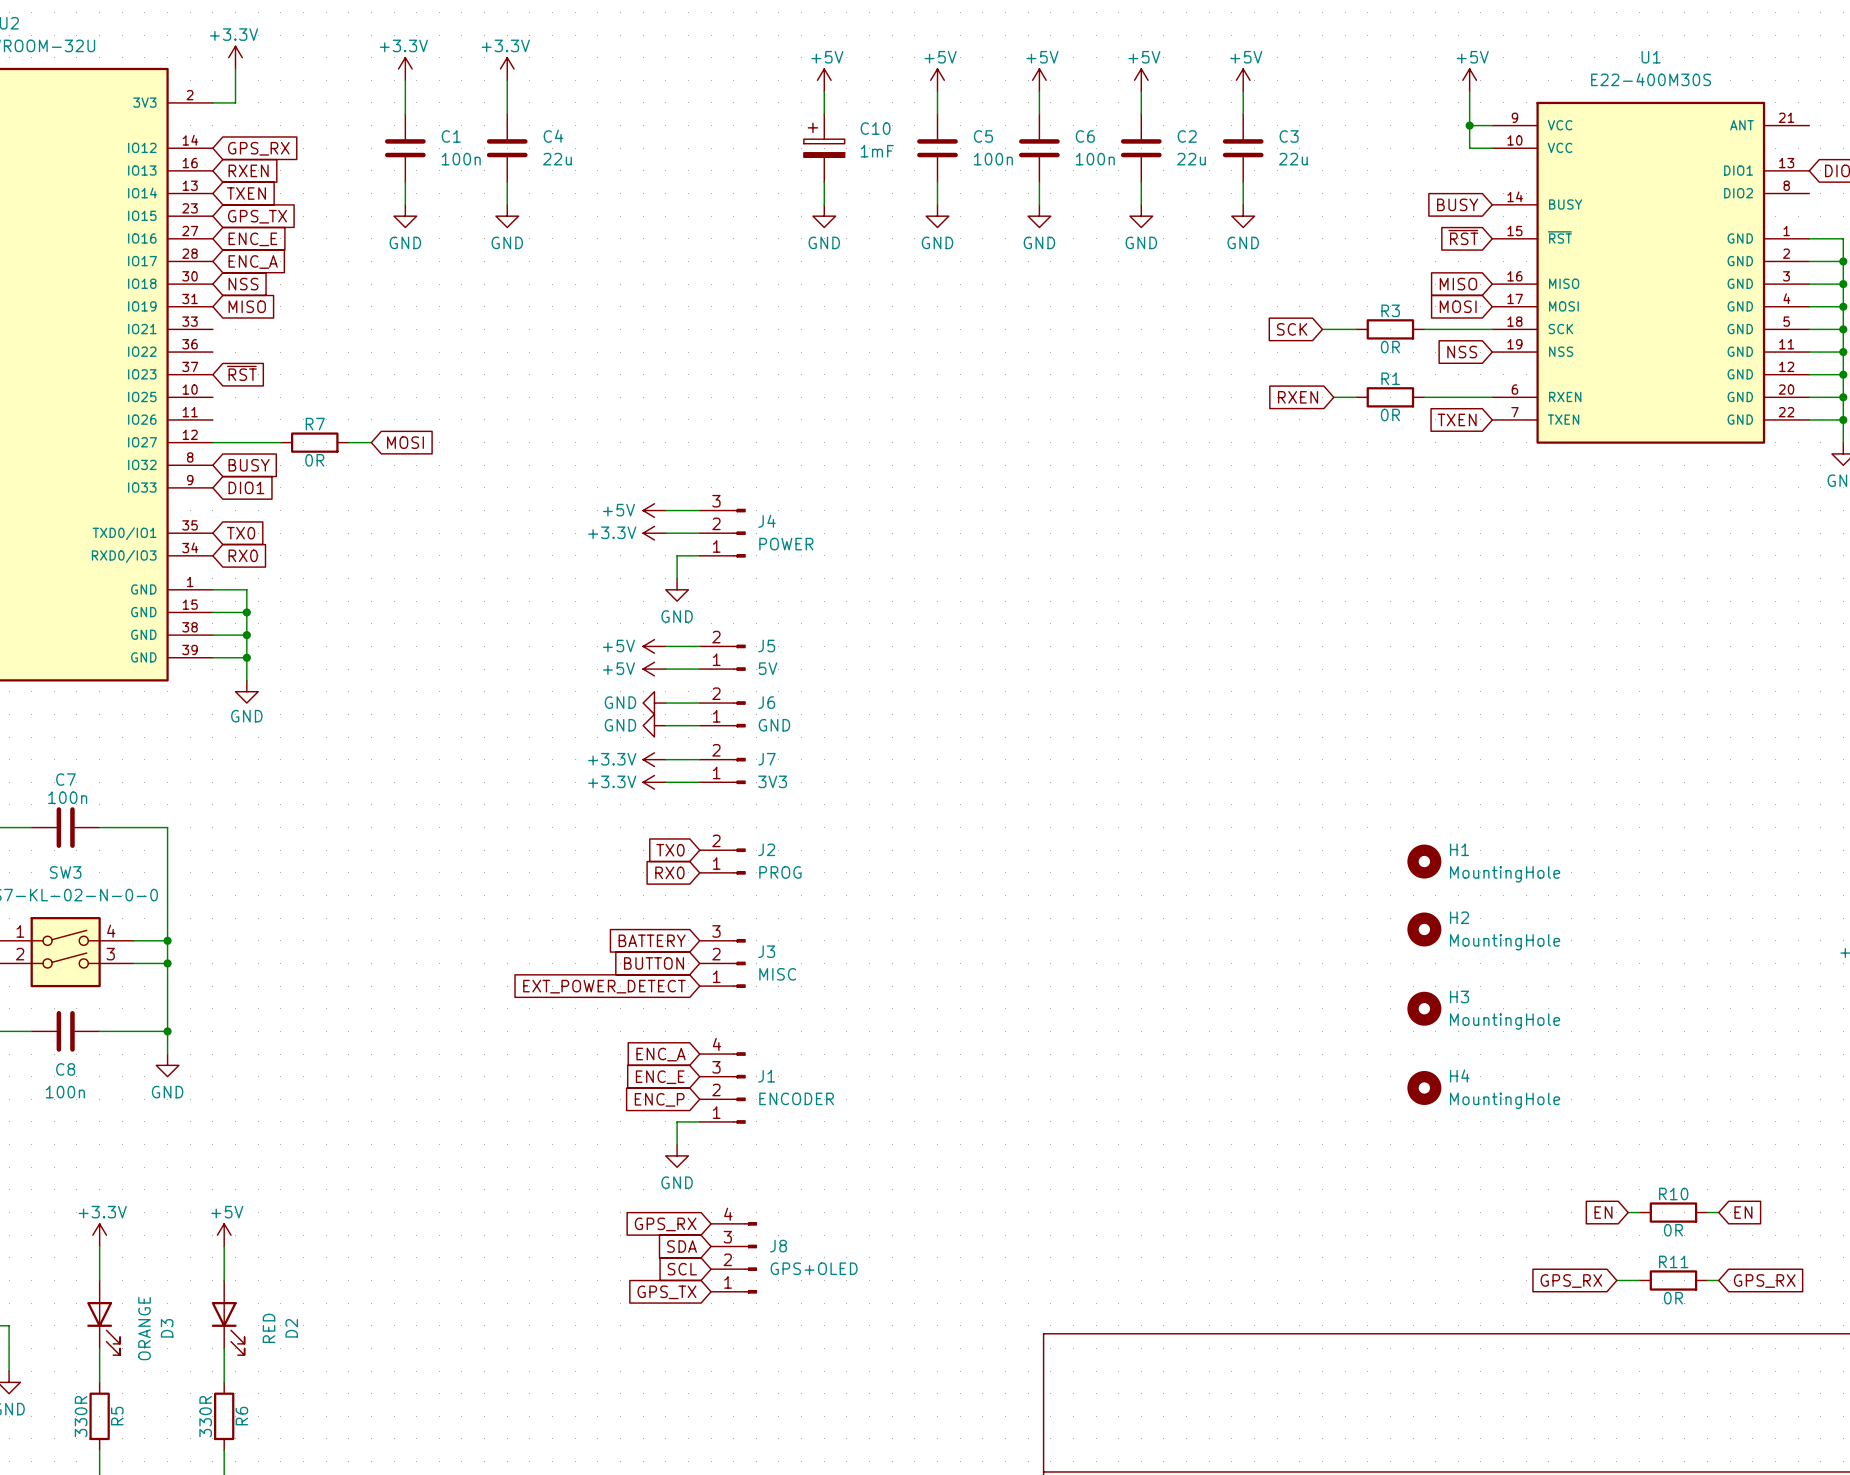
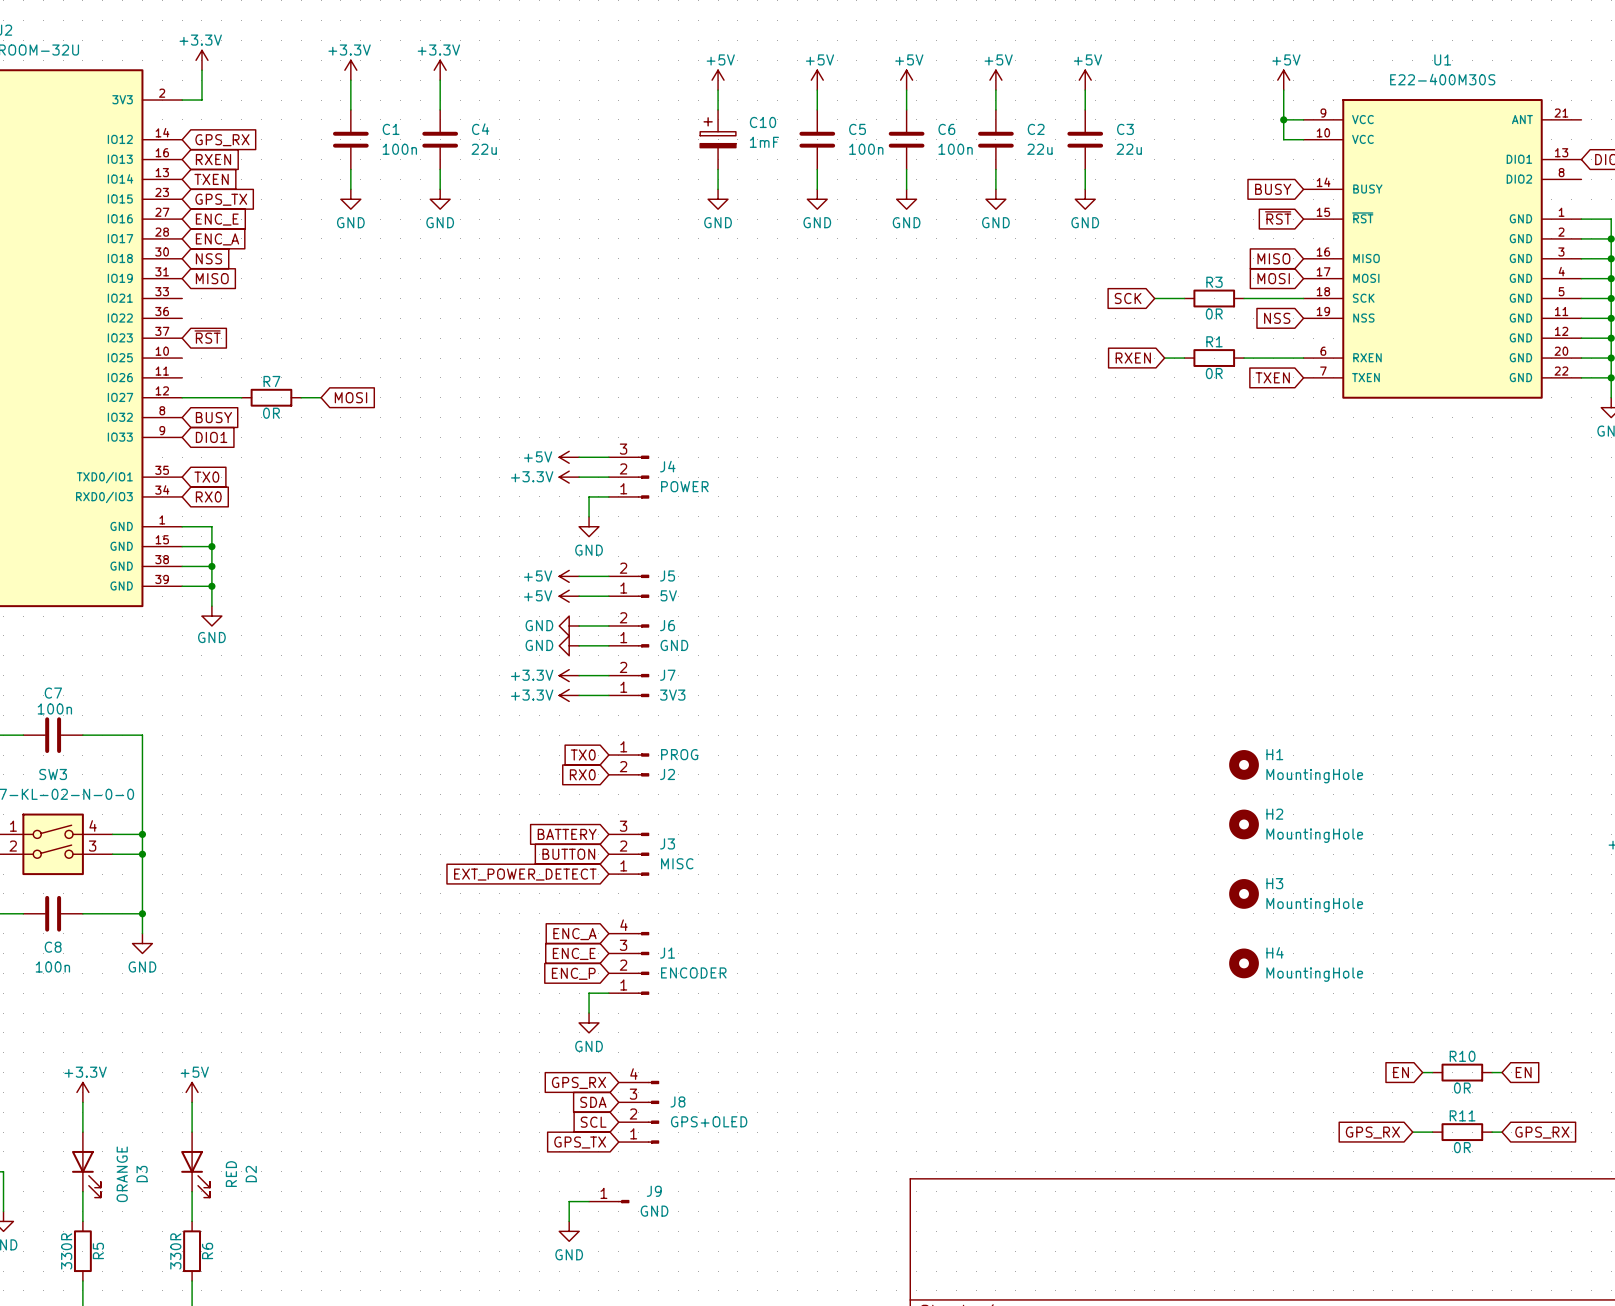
J2 flip: as is (739, 861) -> up-down (643, 764)
wire: none -> (589, 1201) (569, 1201) (569, 1221)
J9: none -> GND (609, 1201)
power symbol: none -> GND (569, 1231)

